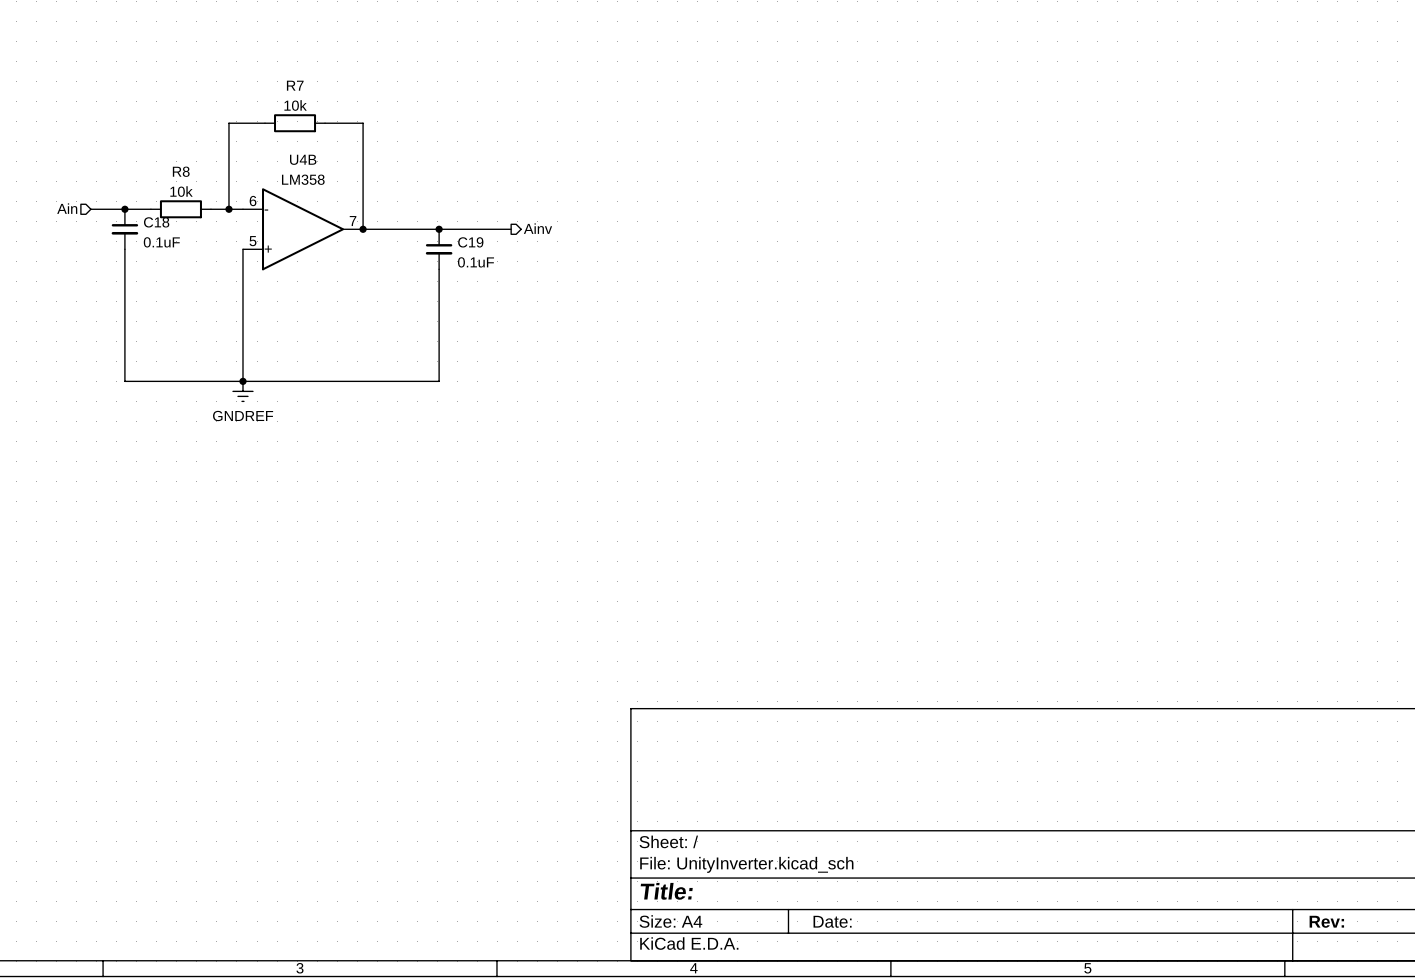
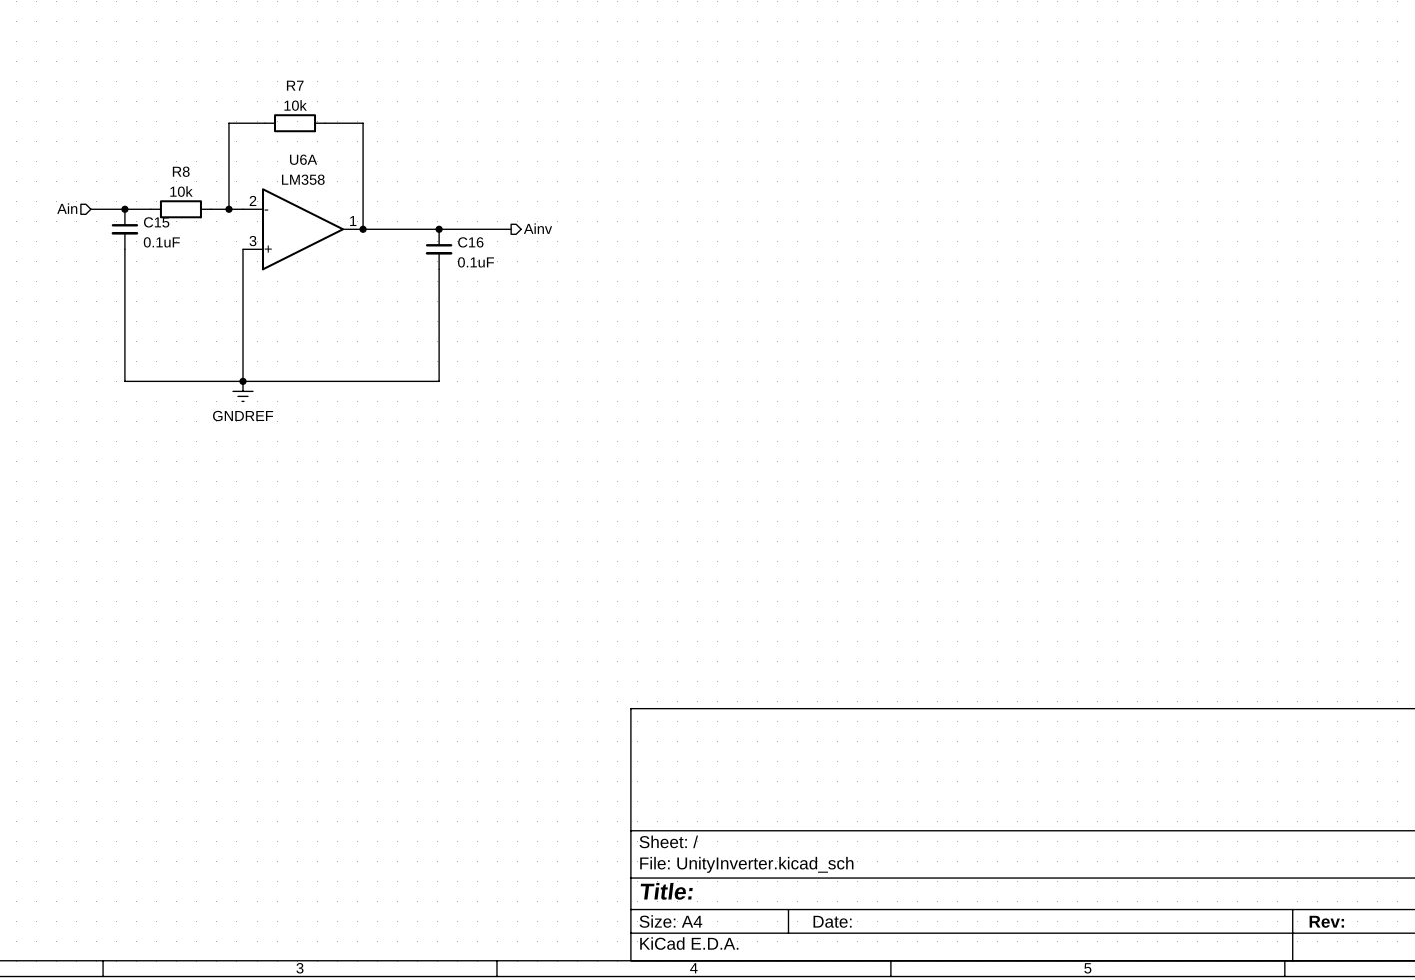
U4B name: U4B (303, 159) -> U6A (303, 159)
U4B pin number: 6 (253, 201) -> 2 (253, 200)
U4B pin number: 7 (353, 221) -> 1 (353, 221)
C18 name: C18 (156, 222) -> C15 (156, 222)
U4B pin number: 5 (252, 241) -> 3 (252, 241)
C19 name: C19 (470, 242) -> C16 (470, 242)

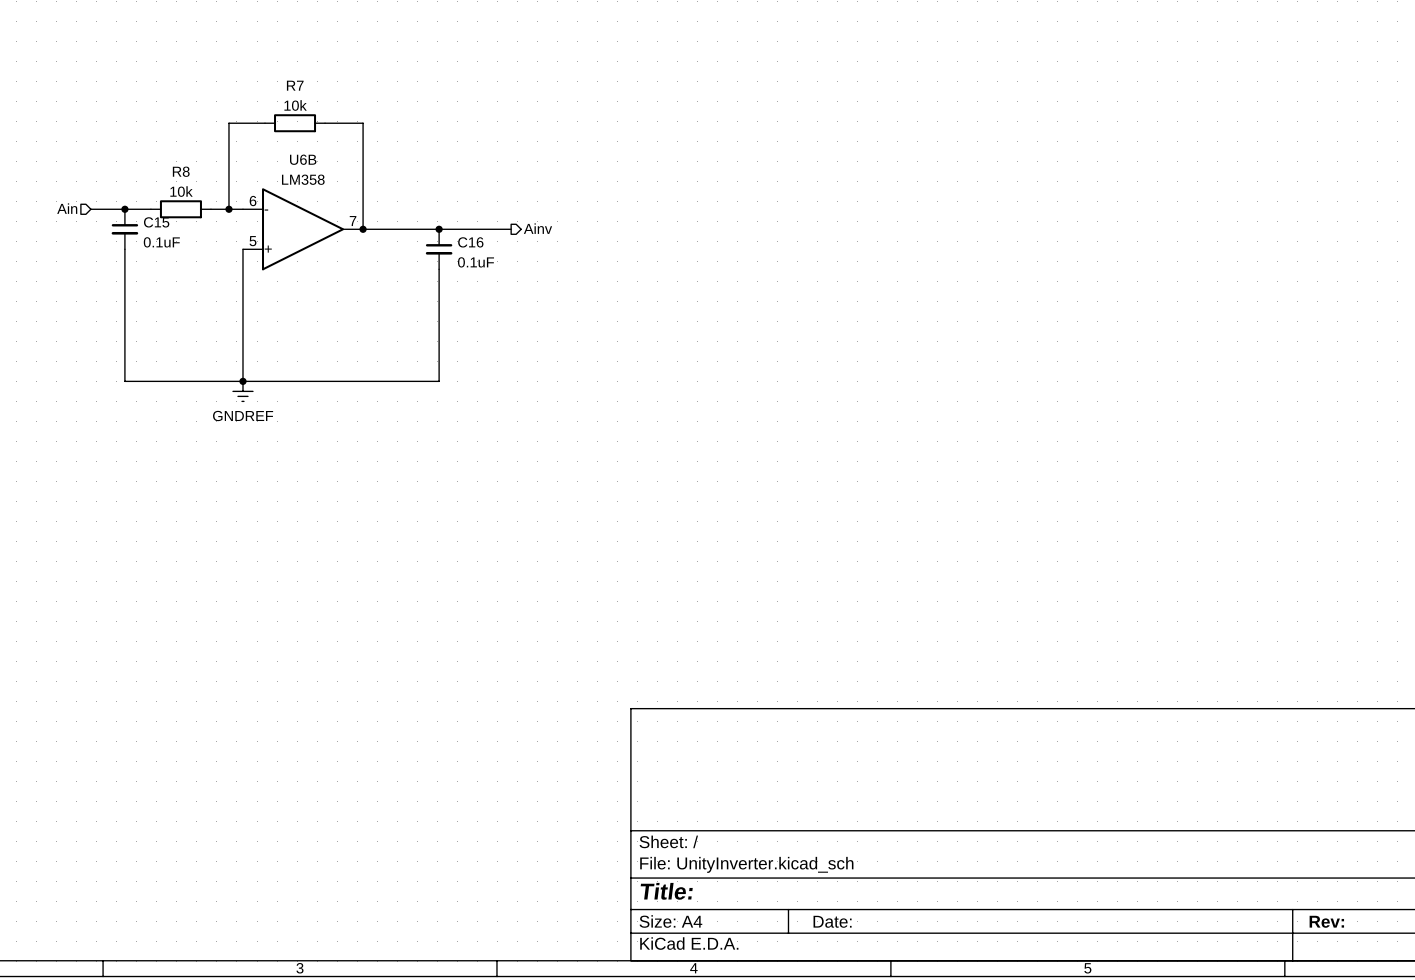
U6A name: U6A (303, 159) -> U6B (303, 159)
U6A pin number: 2 (253, 200) -> 6 (253, 201)
U6A pin number: 1 (353, 221) -> 7 (353, 221)
U6A pin number: 3 (252, 241) -> 5 (252, 241)

